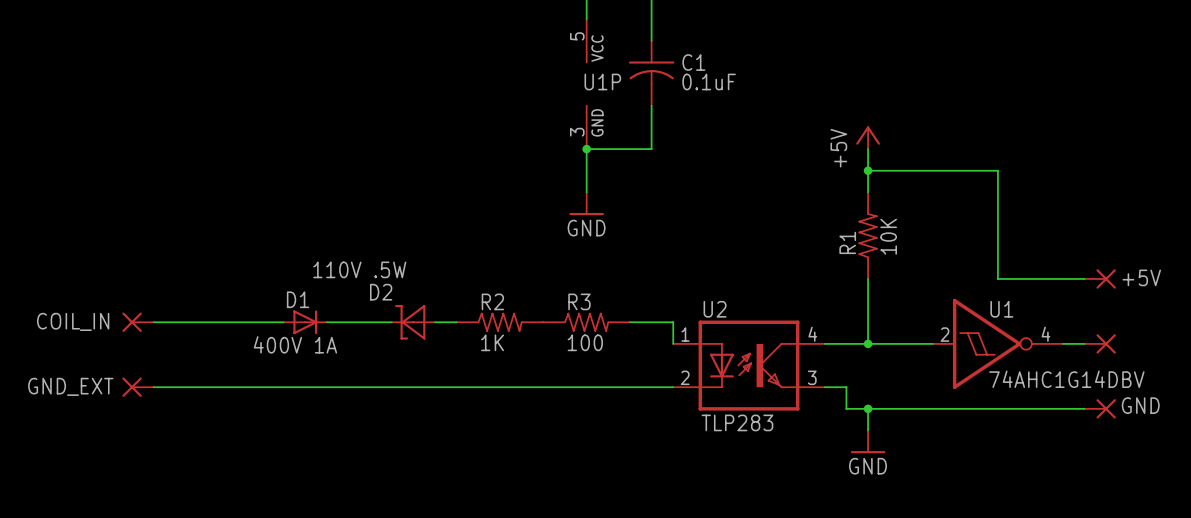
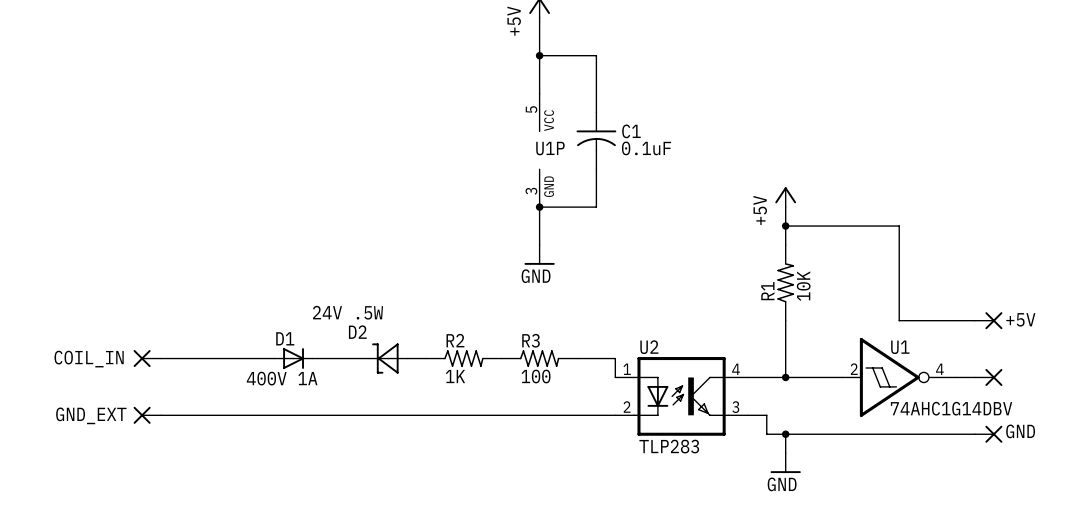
D2 value: 110V .5W (359, 269) -> 24V .5W (348, 312)

